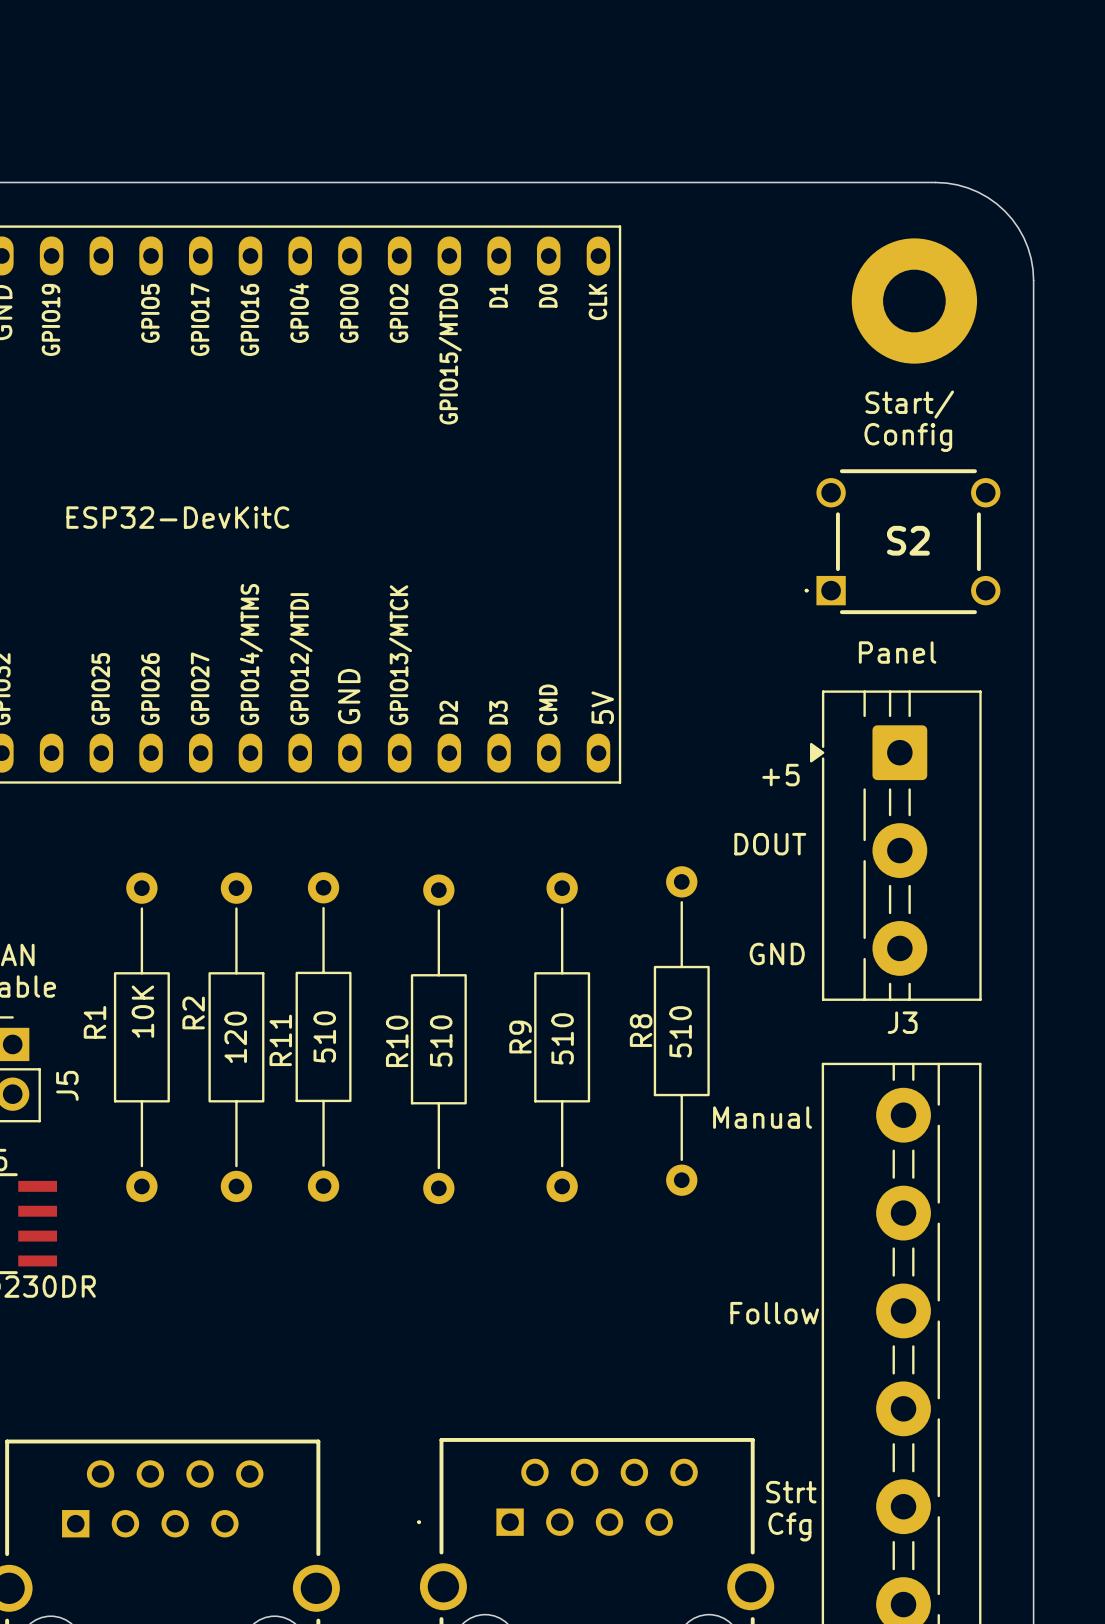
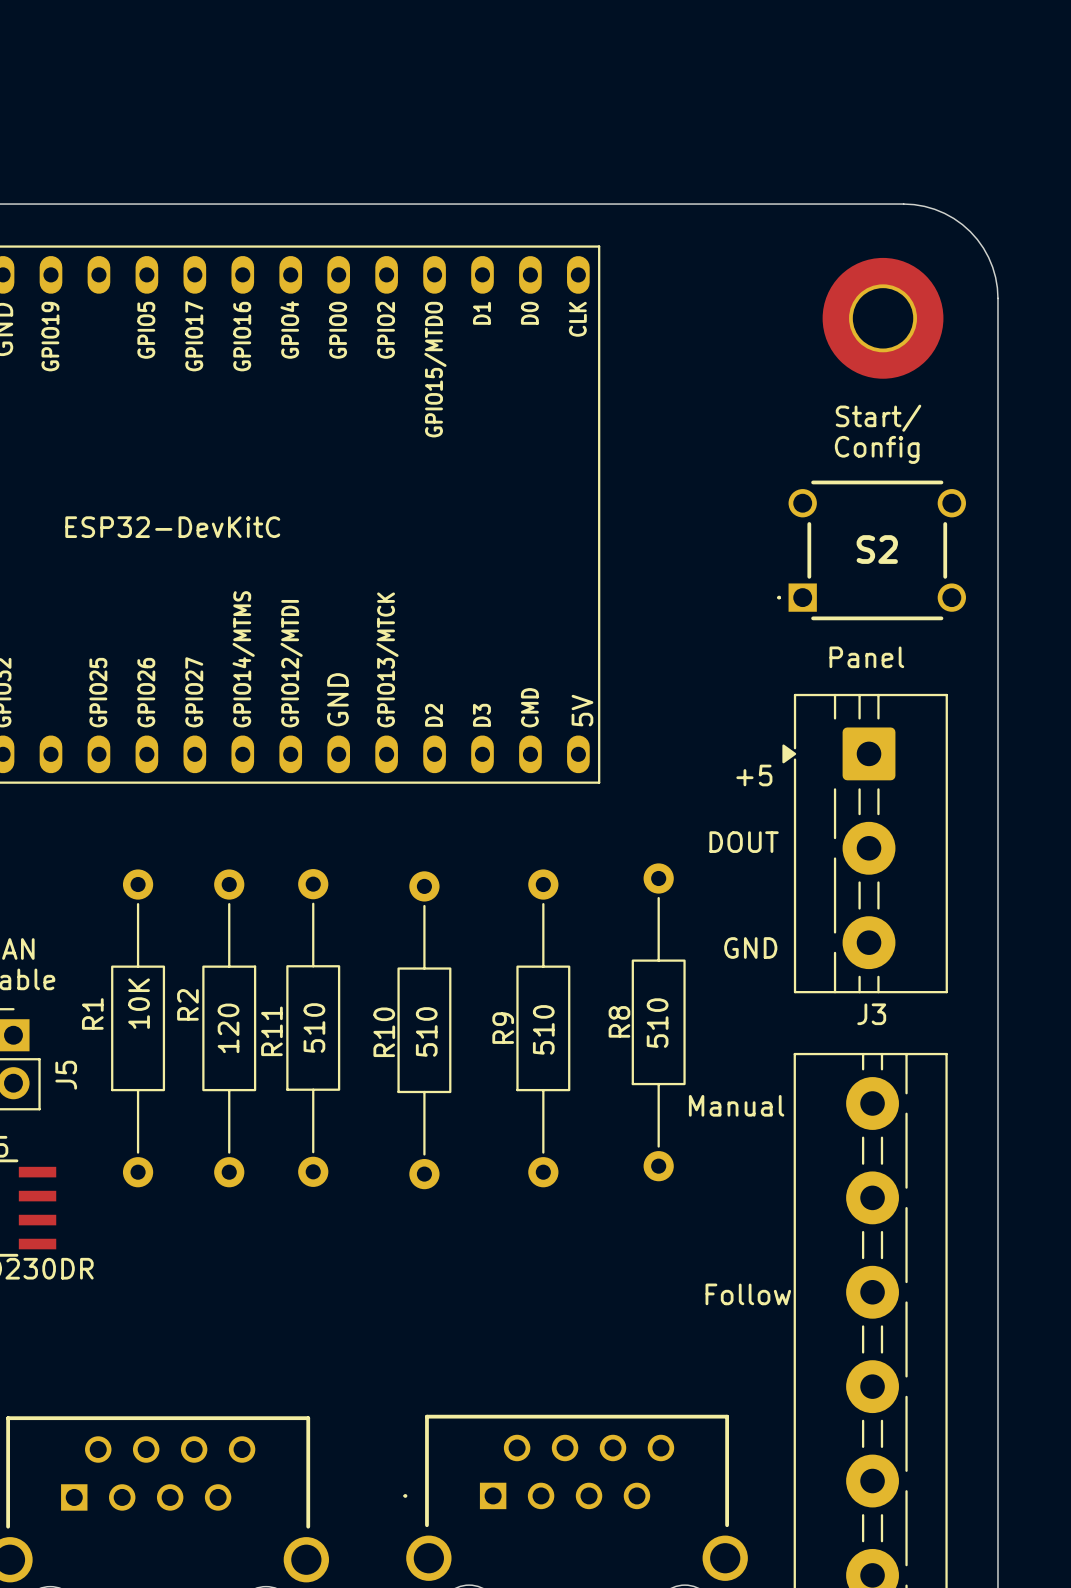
part footprint: [851, 238, 978, 364] -> [822, 257, 944, 379]
text: Strt (791, 1492) -> none
text: Cfg (789, 1526) -> none

